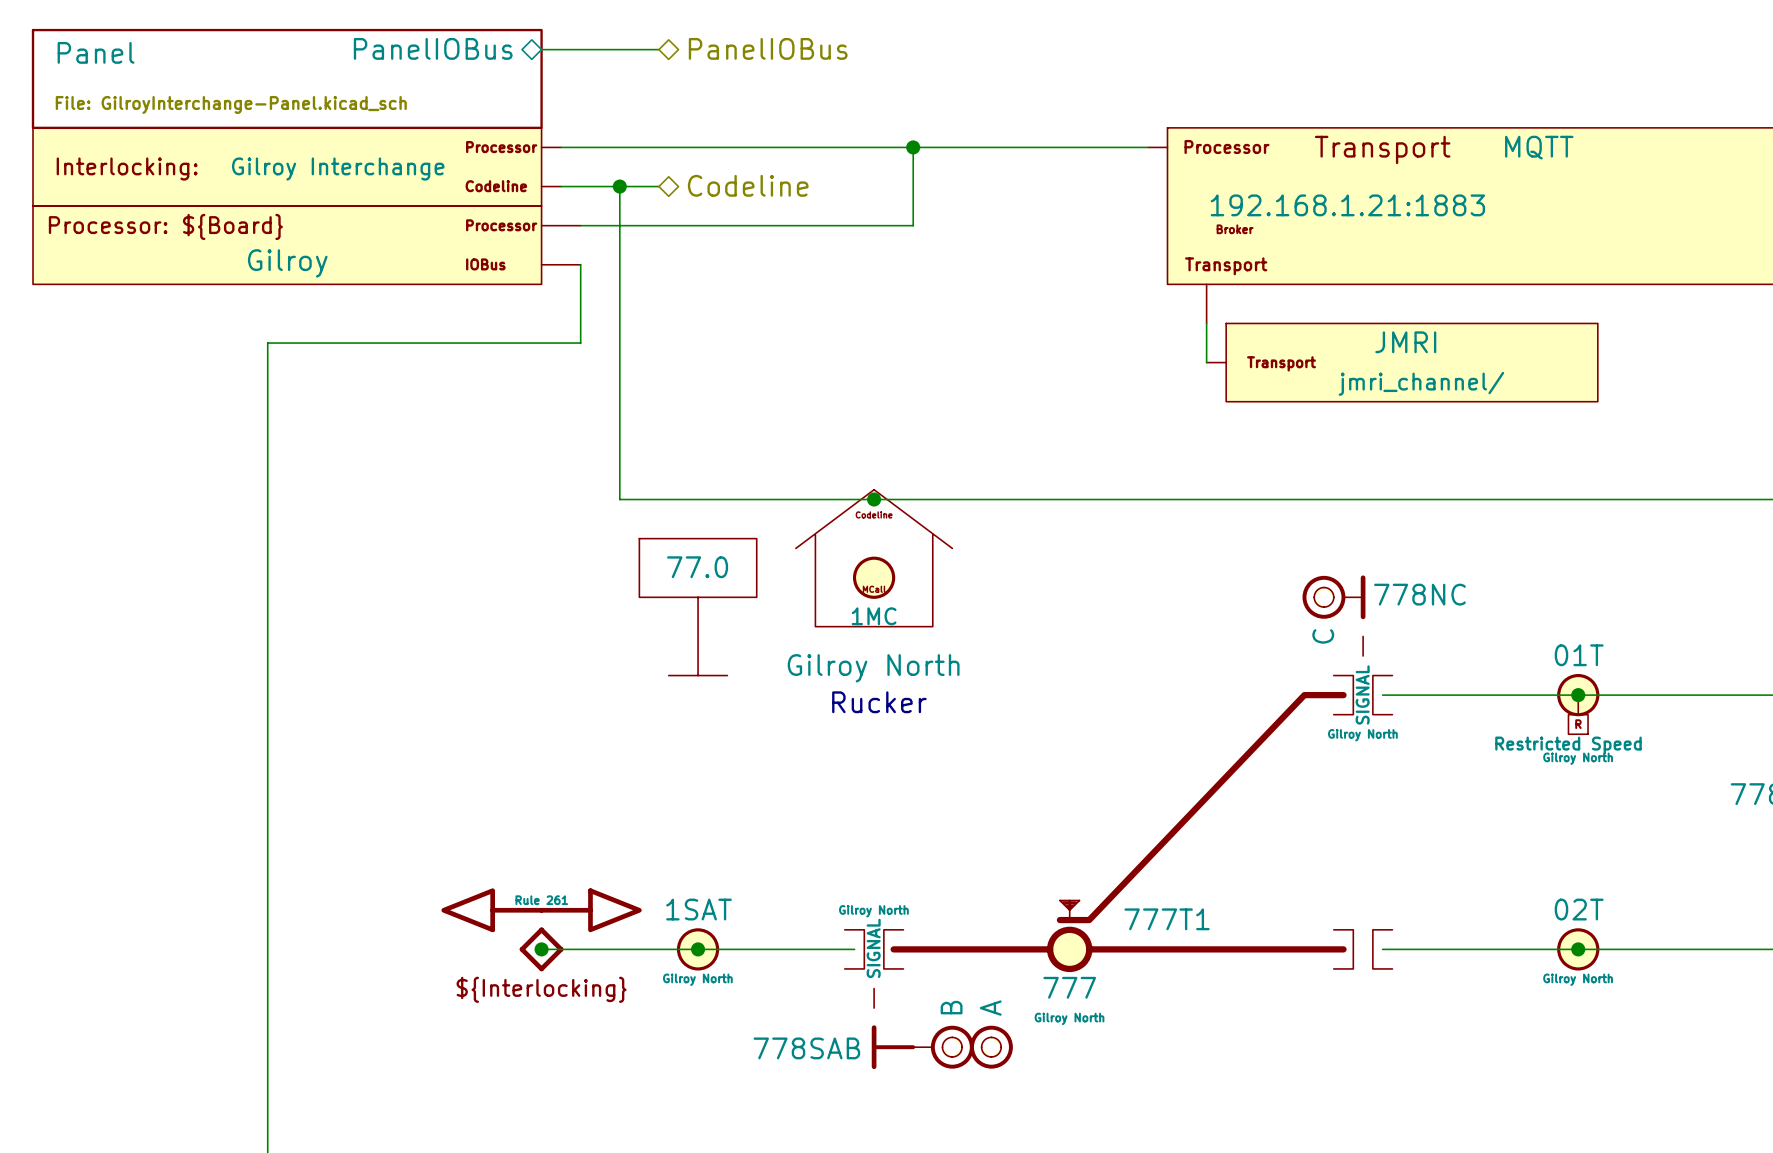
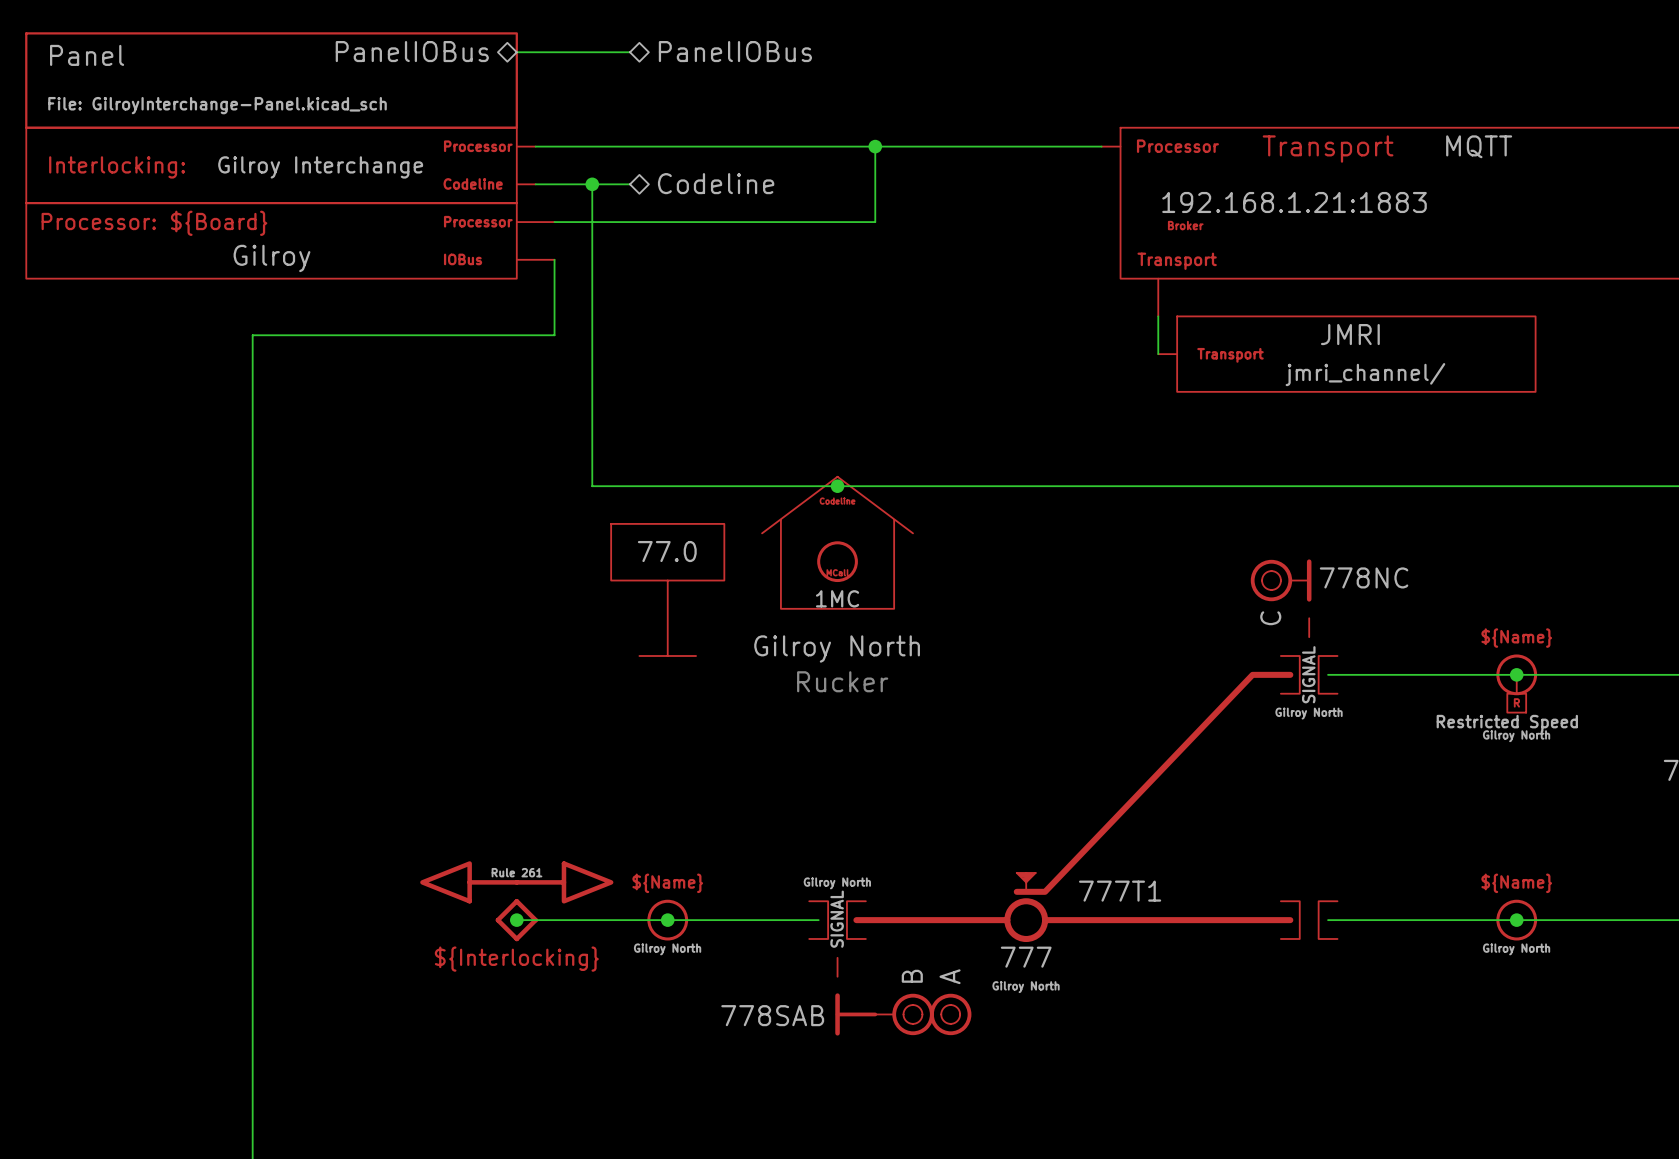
part value: 01T (1579, 655) -> none
part text: none -> ${Name} (1516, 638)
part value: 1SAT (698, 909) -> none
part value: 02T (1579, 909) -> none
part text: none -> ${Name} (667, 883)
part text: none -> ${Name} (1516, 883)

